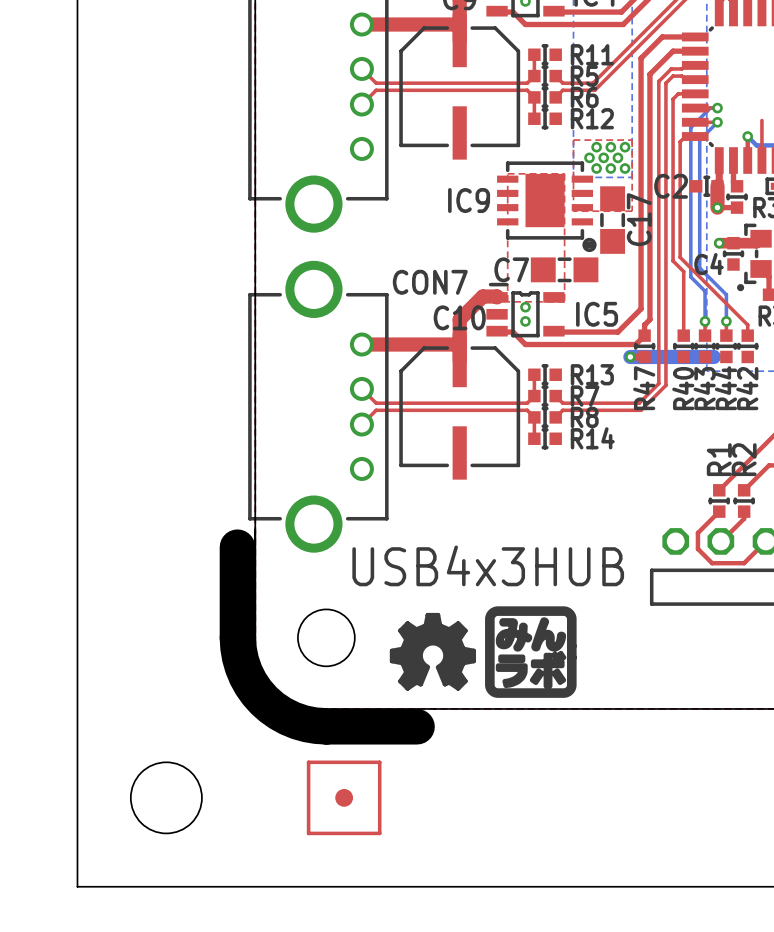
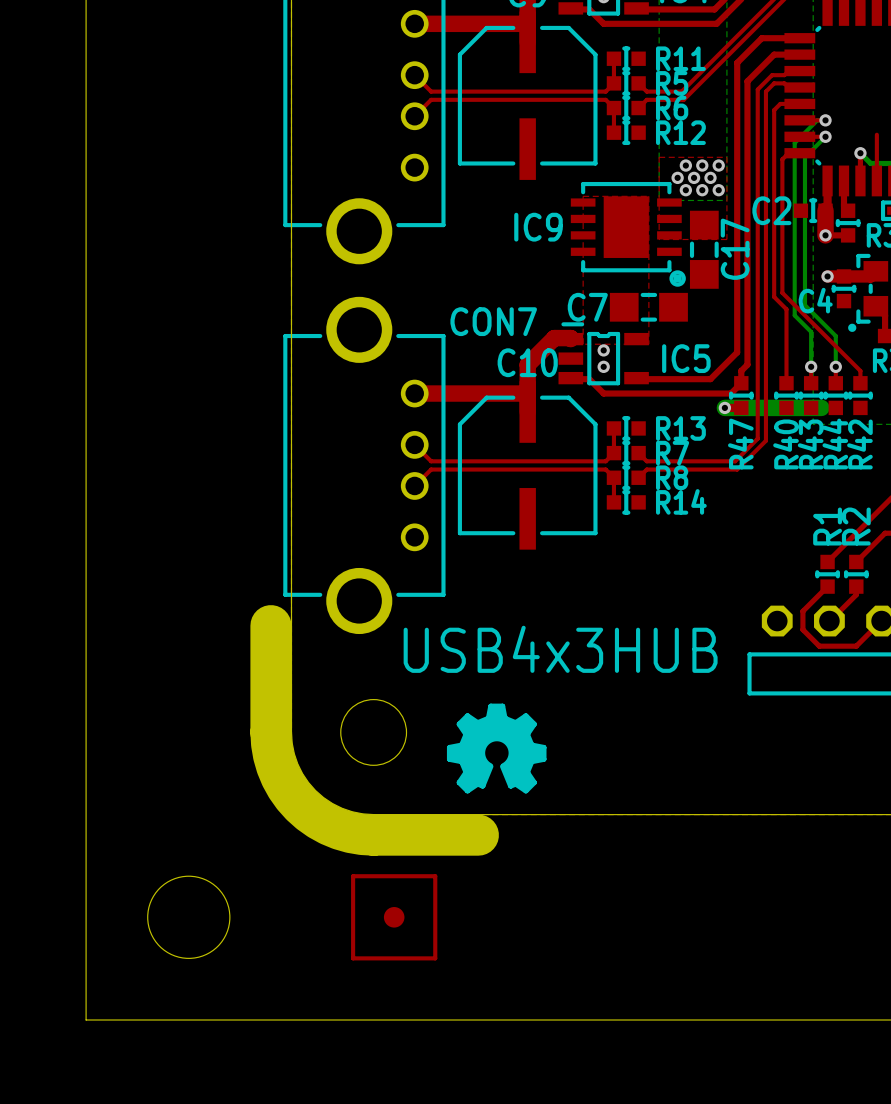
board edge: none -> (270, 625) (271, 743) (281, 777) (301, 805) (329, 824) (362, 834) (478, 835)
drawing: [485, 606, 577, 698] -> none
part: (327, 636) -> none

